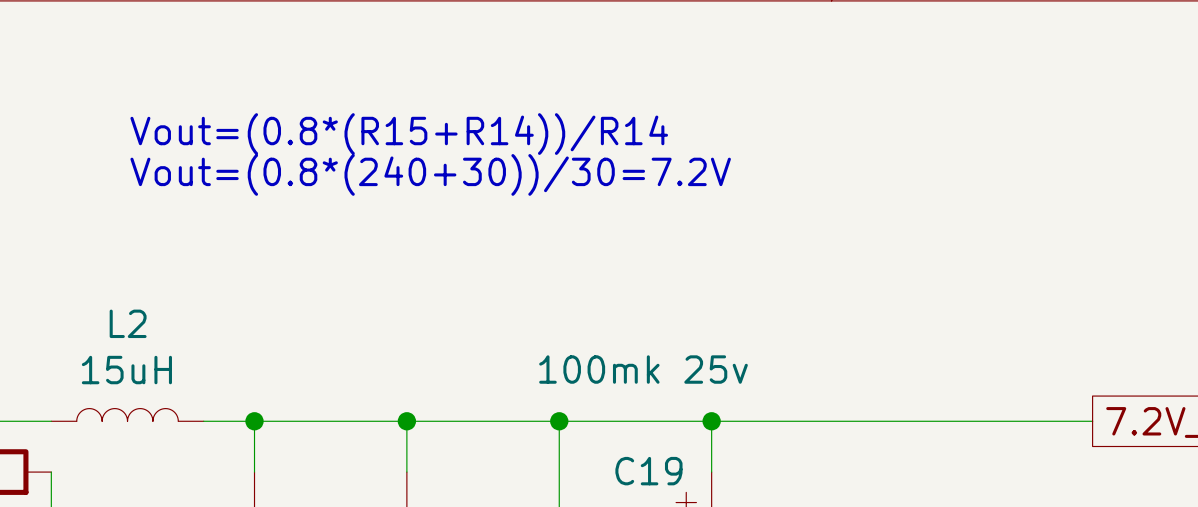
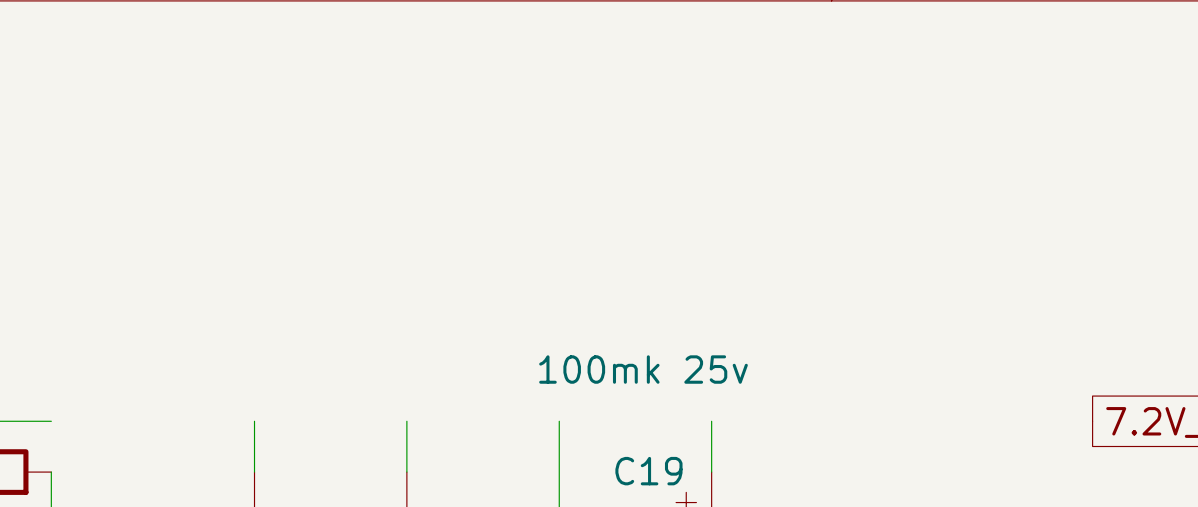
text: Vout=(0.8*(R15+R14))/R14 (399, 134) -> none
text: Vout=(0.8*(240+30))/30=7.2V (430, 174) -> none
L2: 15uH (127, 414) -> none
wire: (203, 421) (1092, 421) -> none
junction: (254, 421) -> none
junction: (406, 421) -> none
junction: (559, 421) -> none
junction: (711, 421) -> none

